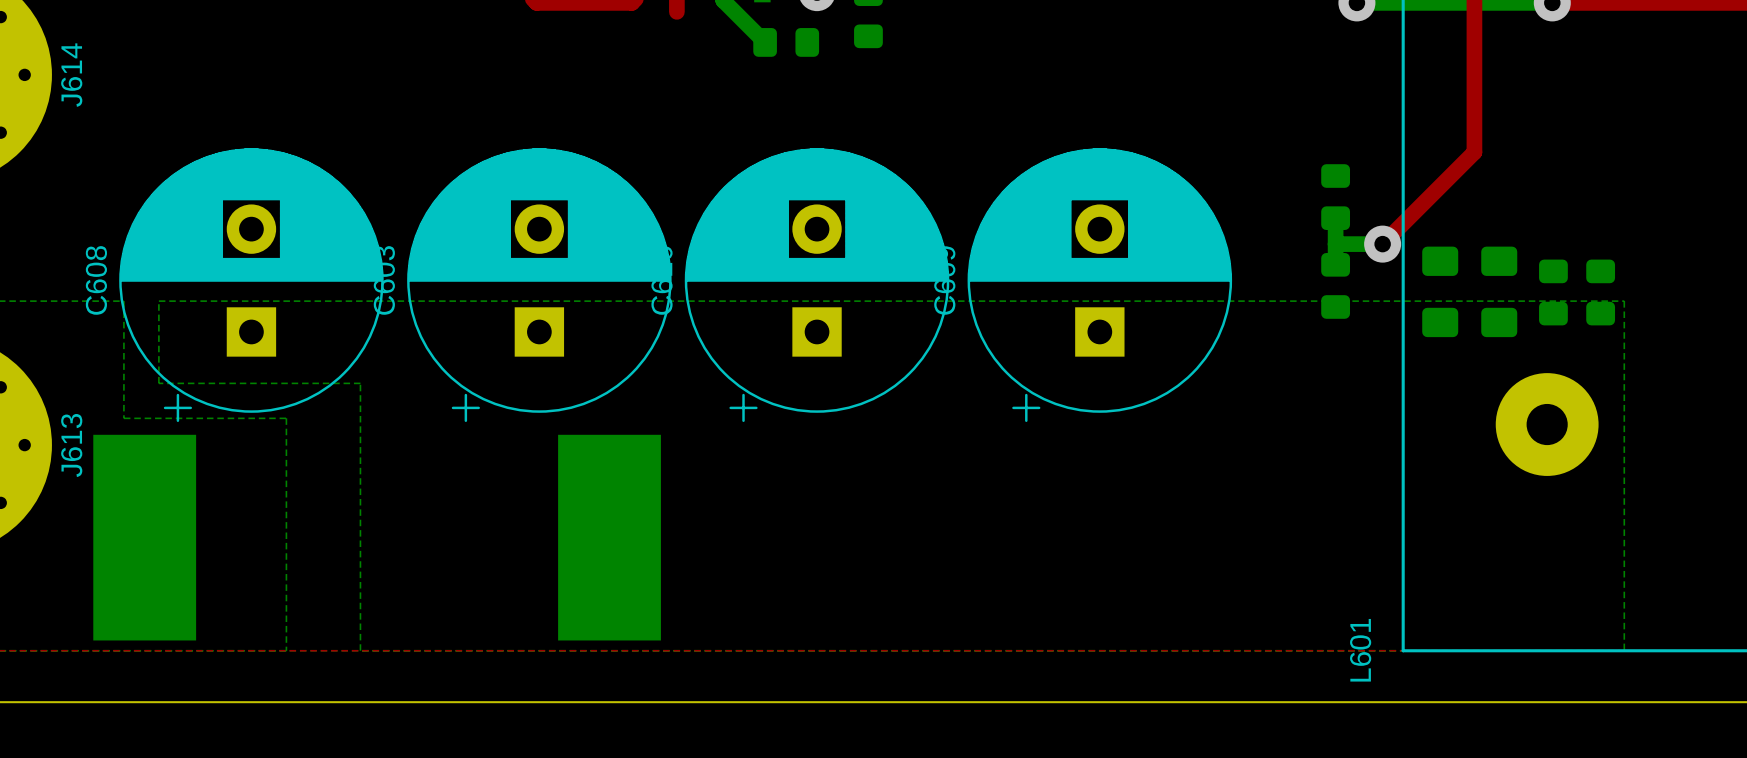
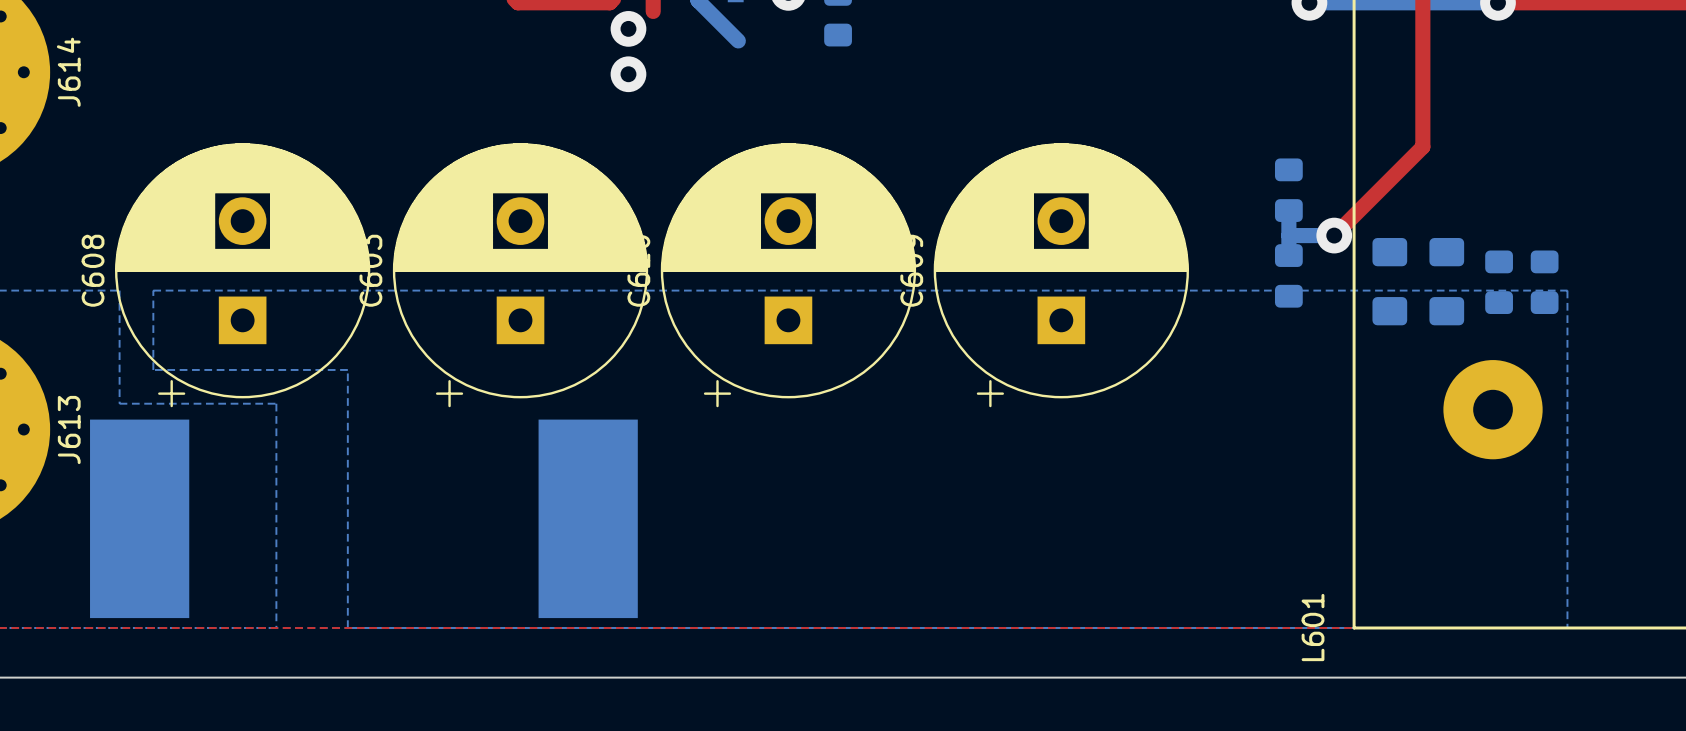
via: none -> (628, 28)
part: (786, 42) -> none
via: none -> (628, 74)

